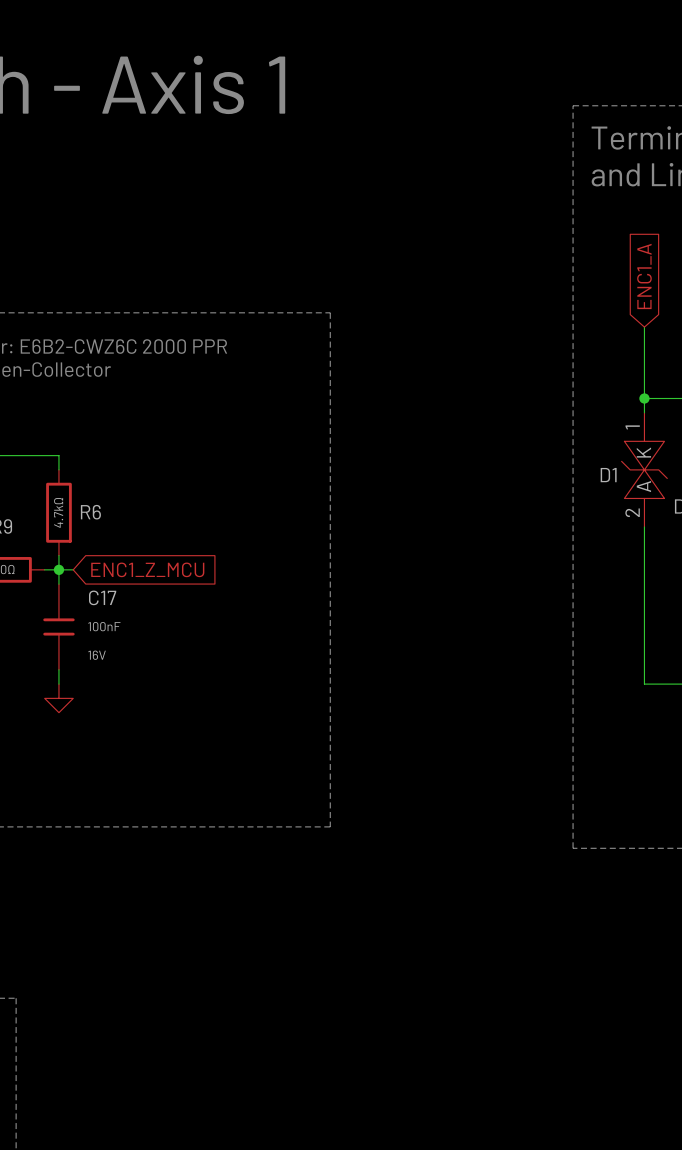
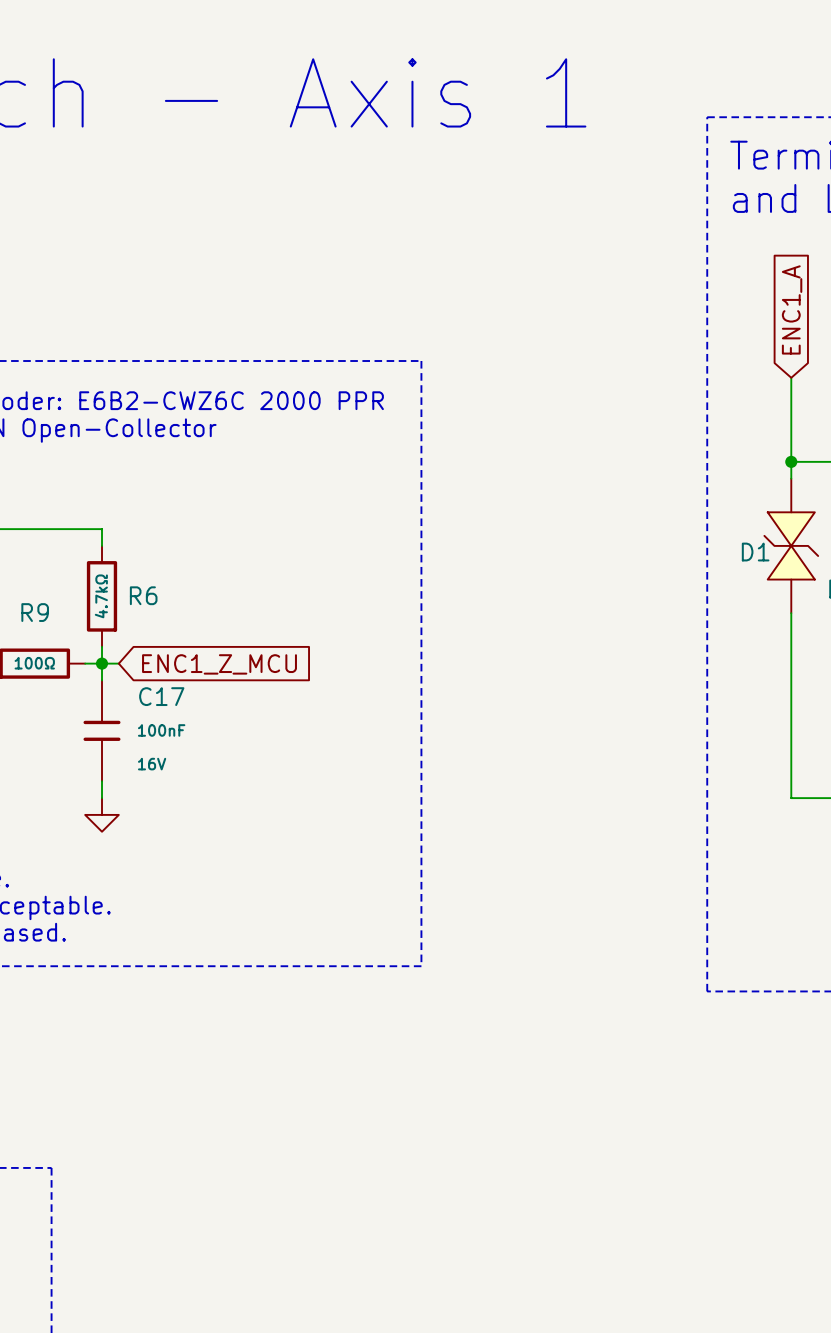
D1 pin number: 1 (632, 427) -> none
D1 pin name: K (643, 452) -> none
D1 pin name: A (643, 486) -> none
D1 pin number: 2 (632, 512) -> none

